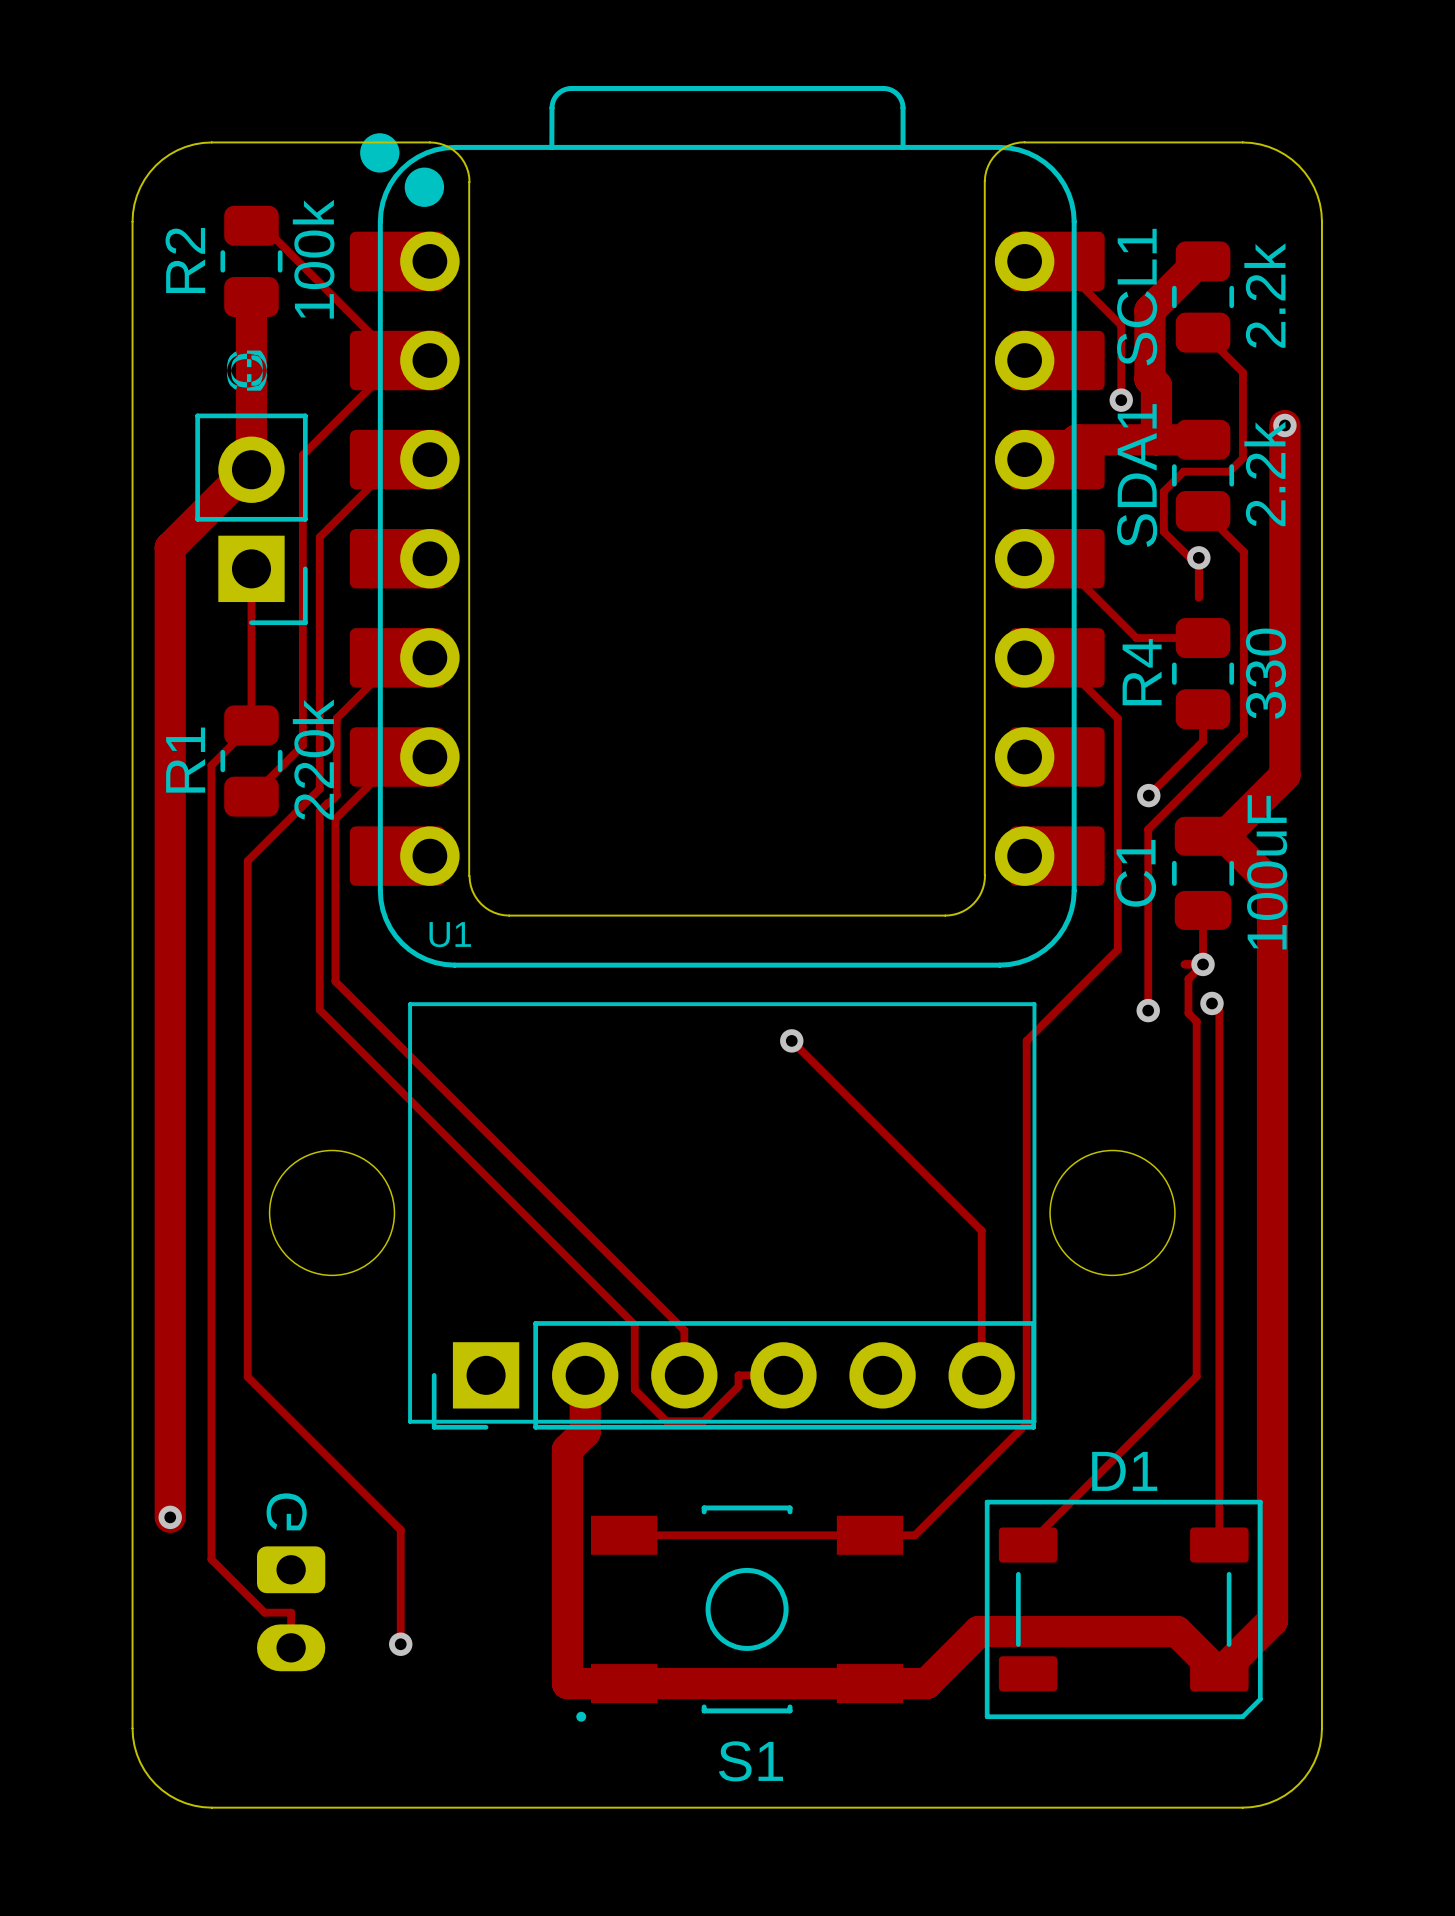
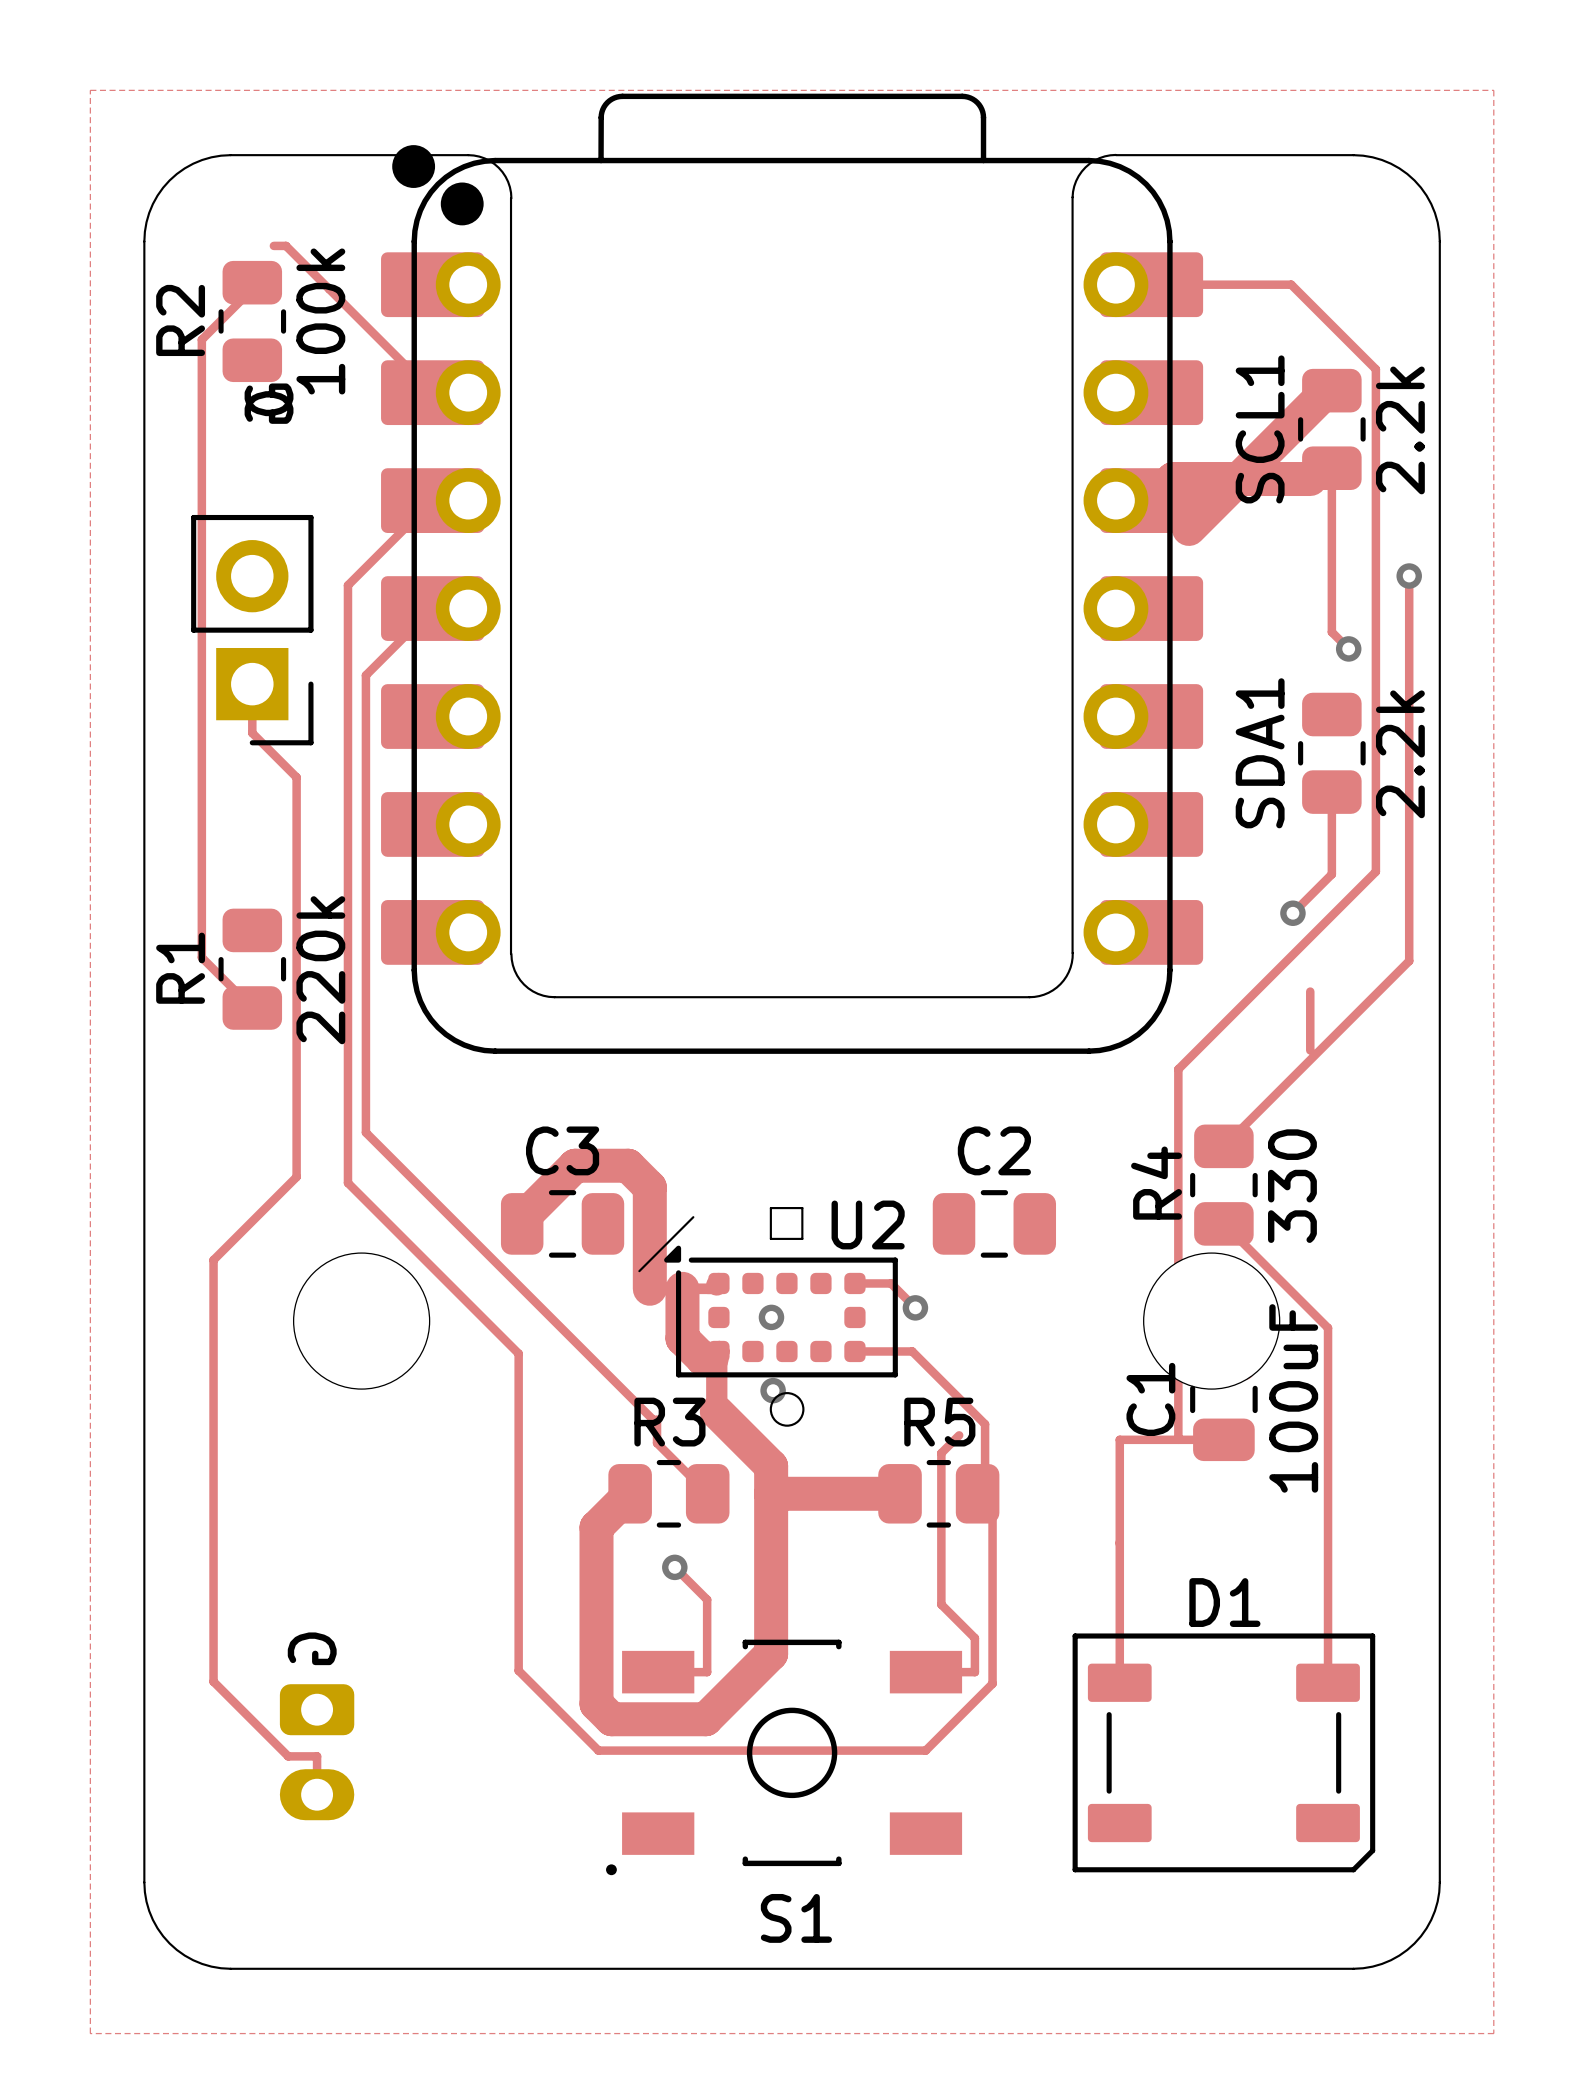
zone outline: none -> (90, 90) (1493, 90) (1493, 2033) (90, 2033) (90, 90)
track: none -> (252, 282) (252, 289) (201, 339) (201, 957) (252, 1007)
R2 position: (251, 261) -> (252, 321)
track: (1057, 261) (1121, 325) (1121, 400) -> (1151, 284) (1291, 284) (1375, 369) (1375, 871) (1178, 1069) (1178, 1439)
track: (1203, 261) (1199, 261) (1149, 310) (1149, 379) (1156, 385) (1156, 439) -> none
track: (251, 297) (251, 469) (248, 469) (170, 547) (170, 1517) -> none
SCL1 position: (1203, 297) -> (1331, 429)
track: (1203, 332) (1242, 372) (1242, 458) (1229, 471) (1183, 471) (1163, 491) (1163, 531) (1189, 557) (1198, 557) (1198, 597) -> none
track: none -> (1331, 390) (1327, 390) (1188, 528)
track: (397, 360) (302, 454) (302, 745) (251, 796) -> none
via: (1121, 400) -> none
track: (1284, 425) (1284, 775) (1223, 836) -> none
via: (1284, 425) -> none
track: none -> (1331, 468) (1331, 632) (1348, 648)
SDA1 position: (1203, 475) -> (1331, 753)
track: (1203, 511) (1243, 551) (1243, 733) (1148, 829) (1148, 1010) -> none
part position: (251, 519) -> (252, 630)
track: none -> (1409, 576) (1409, 961) (1223, 1146)
via: none -> (1409, 576)
track: (319, 537) (319, 788) (247, 860) (247, 1377) (400, 1530) (400, 1644) -> (347, 585) (347, 1182) (518, 1353) (518, 1670) (598, 1750) (925, 1750) (992, 1683) (992, 1508) (977, 1493) (985, 1486) (985, 1424) (912, 1351) (854, 1351)
via: (1198, 557) -> none
track: none -> (432, 608) (365, 675) (365, 1132) (653, 1419) (657, 1419) (657, 1443) (707, 1493)
track: (1057, 558) (1136, 638) (1203, 638) -> none
track: (251, 568) (251, 725) (211, 765) (211, 1559) -> (252, 684) (252, 733) (296, 777) (296, 1177) (213, 1260) (213, 1681) (230, 1698)
via: none -> (1348, 648)
track: (397, 657) (336, 718) (336, 795) (319, 811) (319, 1009) (634, 1324) (634, 1389) (666, 1421) (703, 1421) (738, 1386) (738, 1375) (783, 1375) -> none
track: (1057, 657) (1117, 718) (1117, 949) (1026, 1040) (1026, 1423) (914, 1535) (895, 1535) -> (959, 1435) (941, 1453) (941, 1604) (974, 1638) (974, 1672)
R4 position: (1203, 673) -> (1223, 1185)
track: (1203, 709) (1203, 741) (1148, 795) -> none
track: none -> (1331, 792) (1331, 874) (1292, 913)
track: (397, 757) (335, 818) (335, 981) (684, 1330) (684, 1375) -> none
R1 position: (251, 761) -> (252, 969)
via position: (1148, 795) -> (1292, 913)
track: (1223, 836) (1272, 884) (1272, 1620) (1219, 1673) (1177, 1631) (978, 1631) (926, 1683) (567, 1683) (567, 1449) (585, 1432) (585, 1375) -> none
C1 position: (1203, 873) -> (1223, 1399)
U1 name: U1 (450, 934) -> none
track: (1184, 964) (1203, 964) (1188, 979) (1188, 1013) (1196, 1021) (1196, 1376) (1028, 1545) -> (1223, 1439) (1119, 1439) (1119, 1682)
via: (1203, 964) -> none
via: (1211, 1003) -> none
track: (1219, 1003) (1211, 1003) (1219, 1010) (1219, 1219) -> (1223, 1223) (1328, 1328)
line: (410, 1004) (410, 1421) (1034, 1421) (1034, 1004) (410, 1004) -> none
via: (1148, 1010) -> none
track: (791, 1040) (981, 1230) (981, 1375) -> none
via: (791, 1040) -> none
line: none -> (770, 1208) (802, 1208) (802, 1238) (770, 1238) (770, 1208)
line: none -> (693, 1217) (639, 1271)
track: none -> (522, 1223) (522, 1218) (575, 1165) (628, 1165) (649, 1187) (649, 1288) (712, 1288) (718, 1283)
C3: none -> (562, 1223)
C2: none -> (994, 1223)
track: none -> (854, 1283) (891, 1283) (915, 1307)
track: none -> (682, 1288) (682, 1338) (702, 1358) (711, 1358) (718, 1351)
via: none -> (915, 1307)
U2: none -> (780, 1311)
via: none -> (771, 1317)
track: none -> (716, 1353) (716, 1411) (771, 1466) (771, 1653) (705, 1719) (611, 1719) (596, 1703) (596, 1527) (630, 1493)
via: none -> (773, 1390)
drawing: none -> [769, 1392, 805, 1427]
R3: none -> (668, 1493)
track: none -> (771, 1493) (900, 1493)
R5: none -> (938, 1493)
part: (733, 1375) -> none
via: none -> (674, 1567)
via: (170, 1517) -> none
track: (649, 1535) (850, 1535) -> (707, 1672) (707, 1599) (674, 1567)
S1 position: (739, 1613) -> (784, 1757)
via: (400, 1644) -> none

